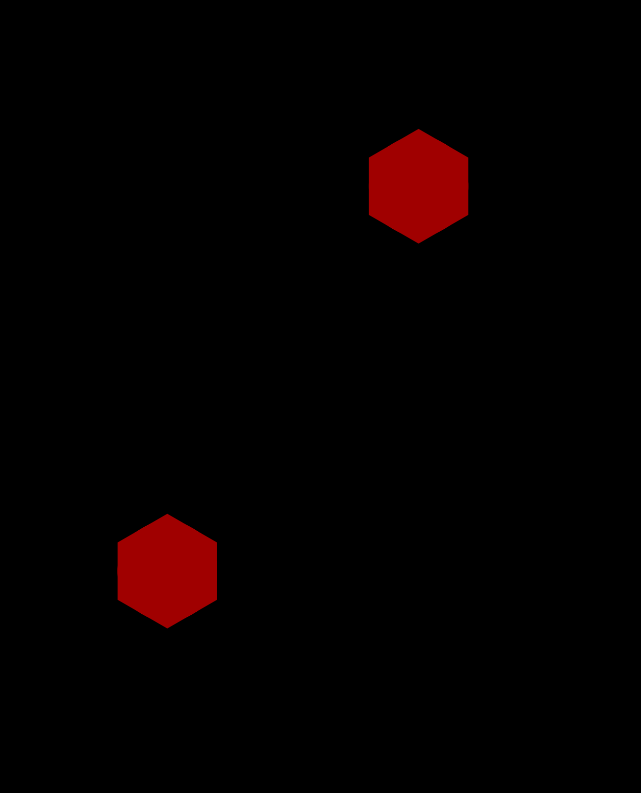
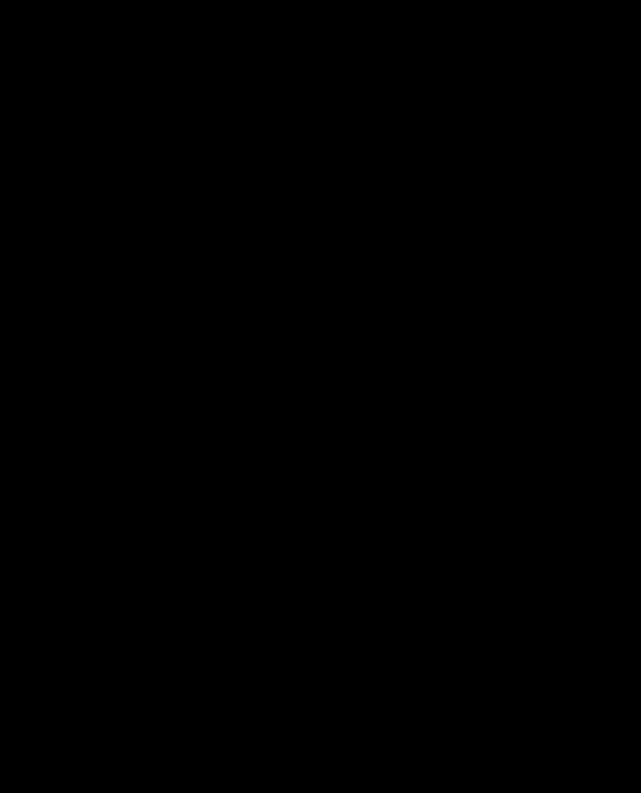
part: (418, 186) -> none
part: (167, 571) -> none

